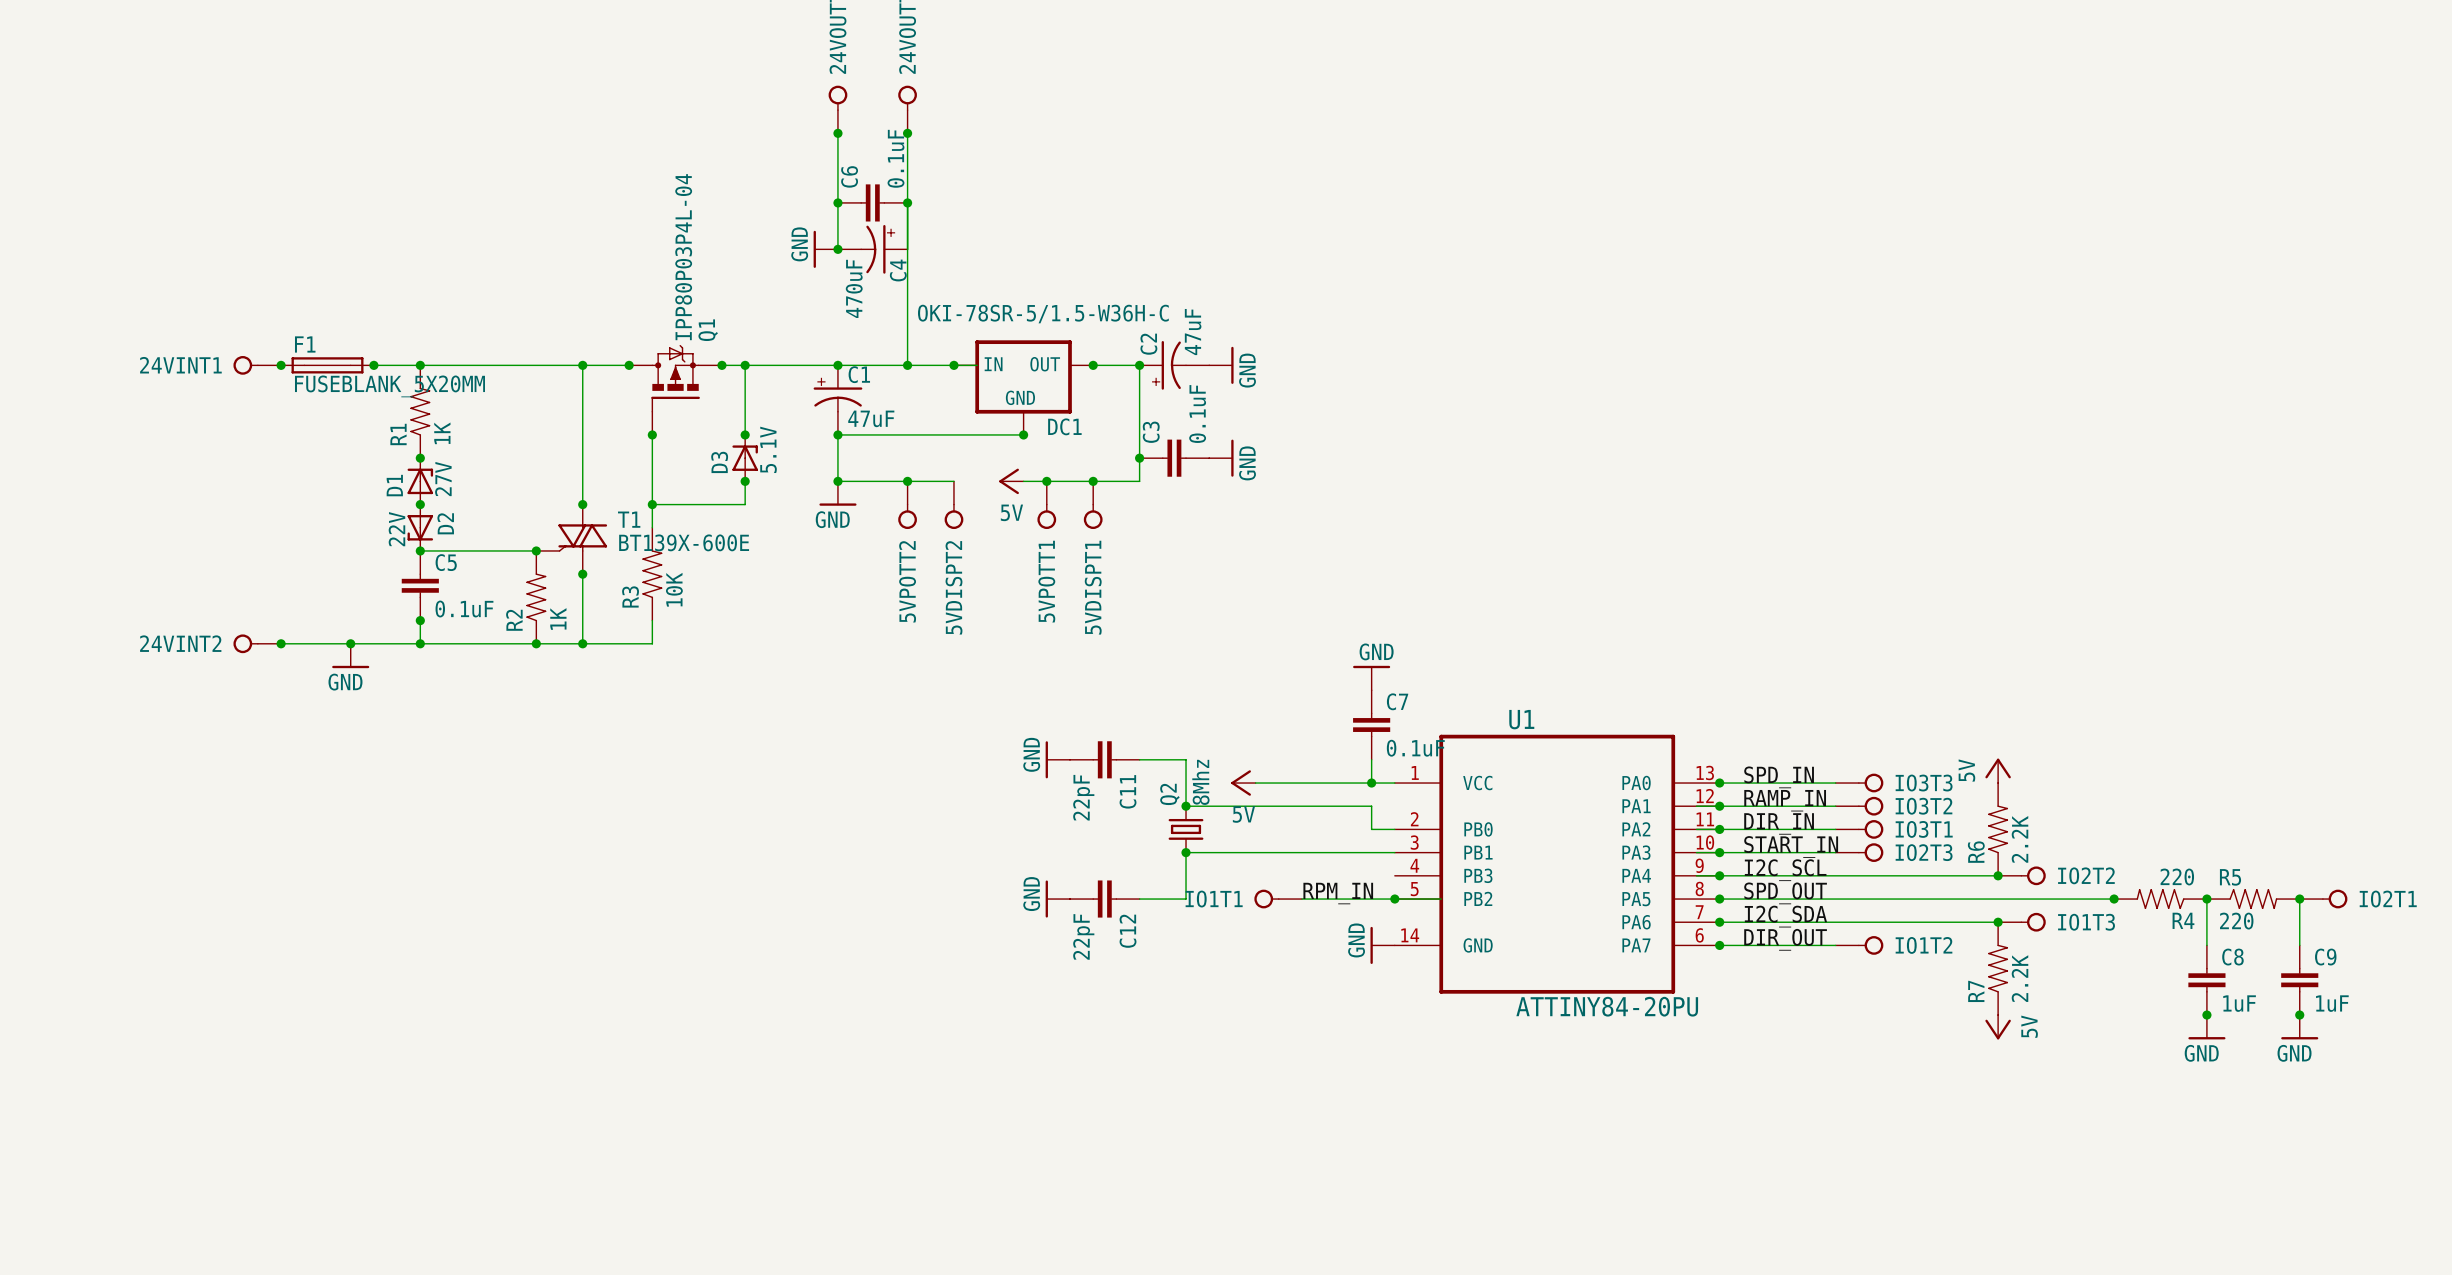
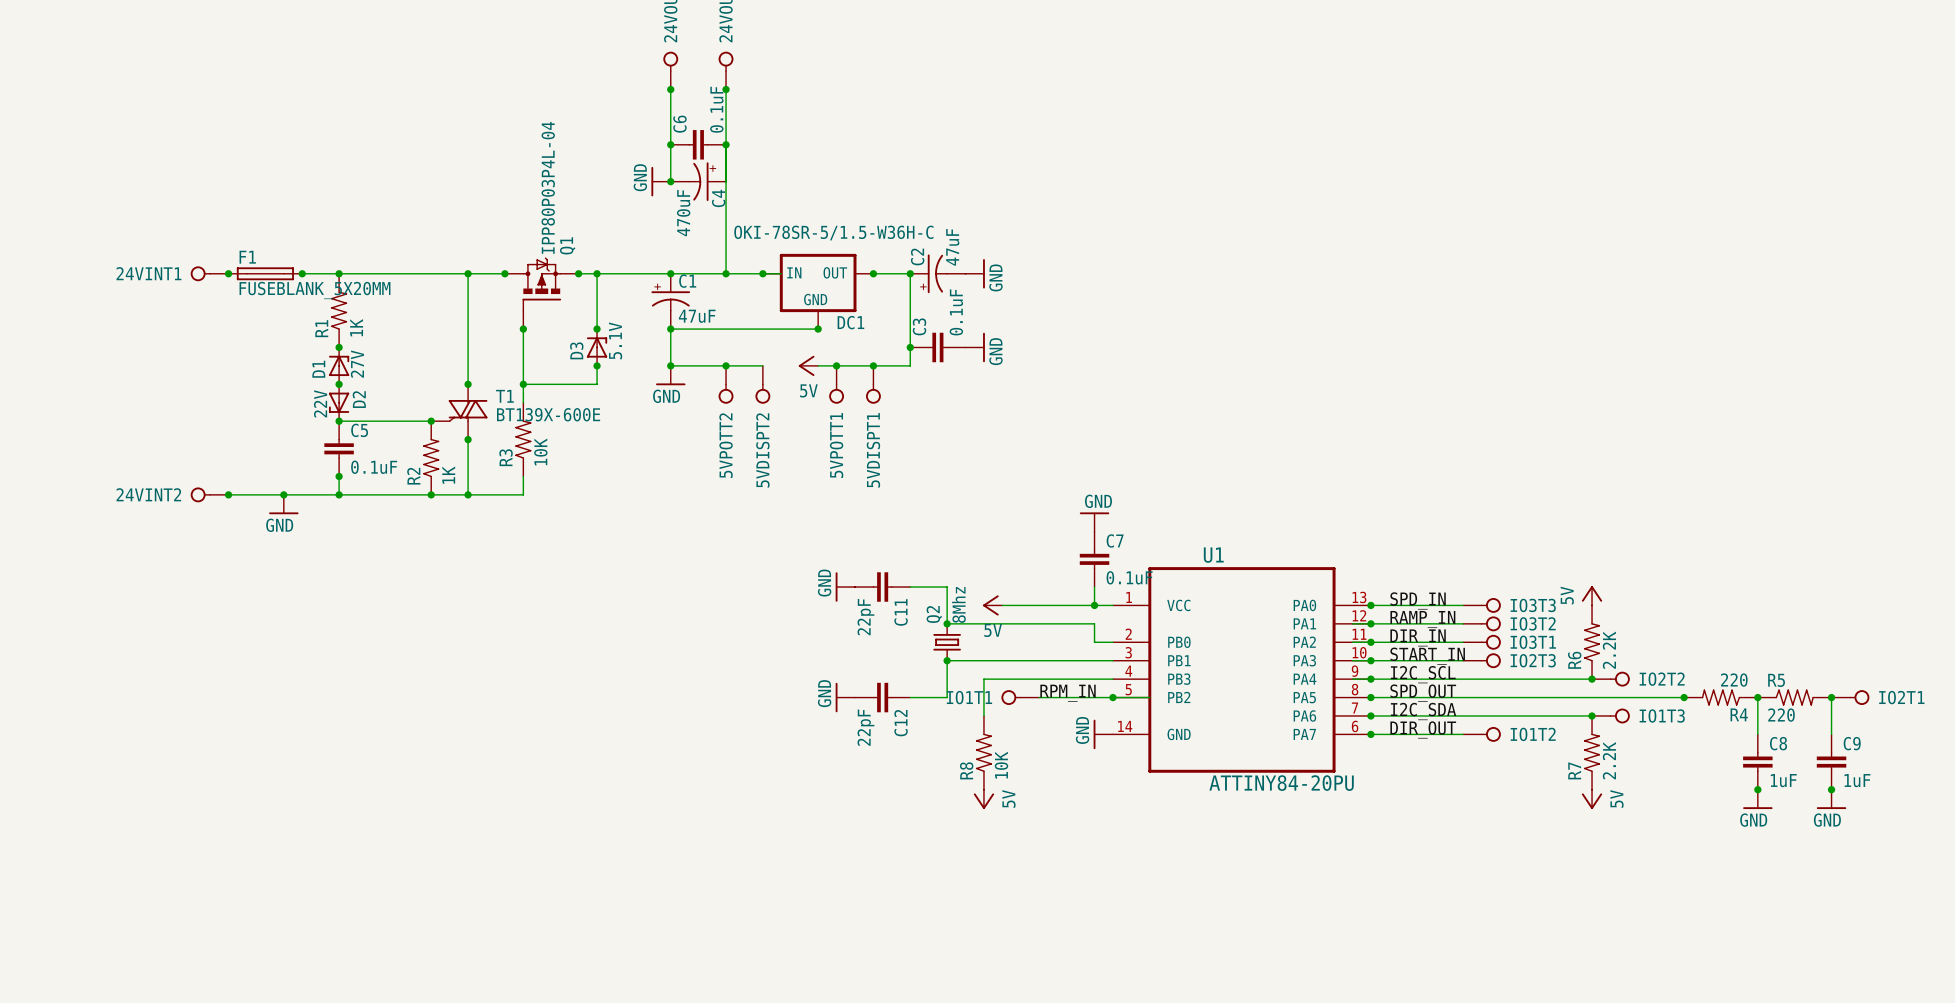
wire: none -> (1112, 679) (983, 679) (983, 715)
R8: none -> 10K (983, 752)
power symbol: none -> 5V (983, 799)

